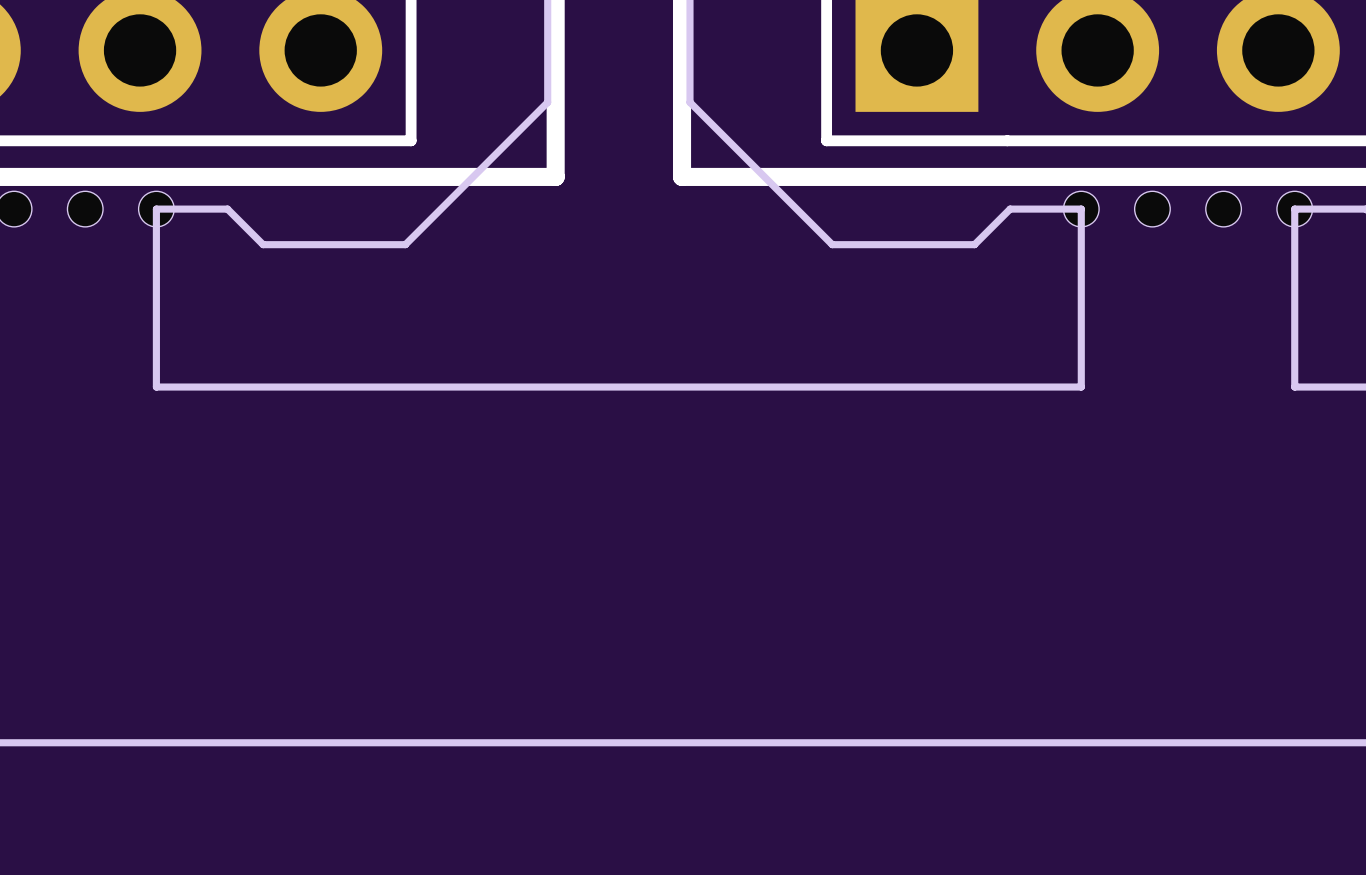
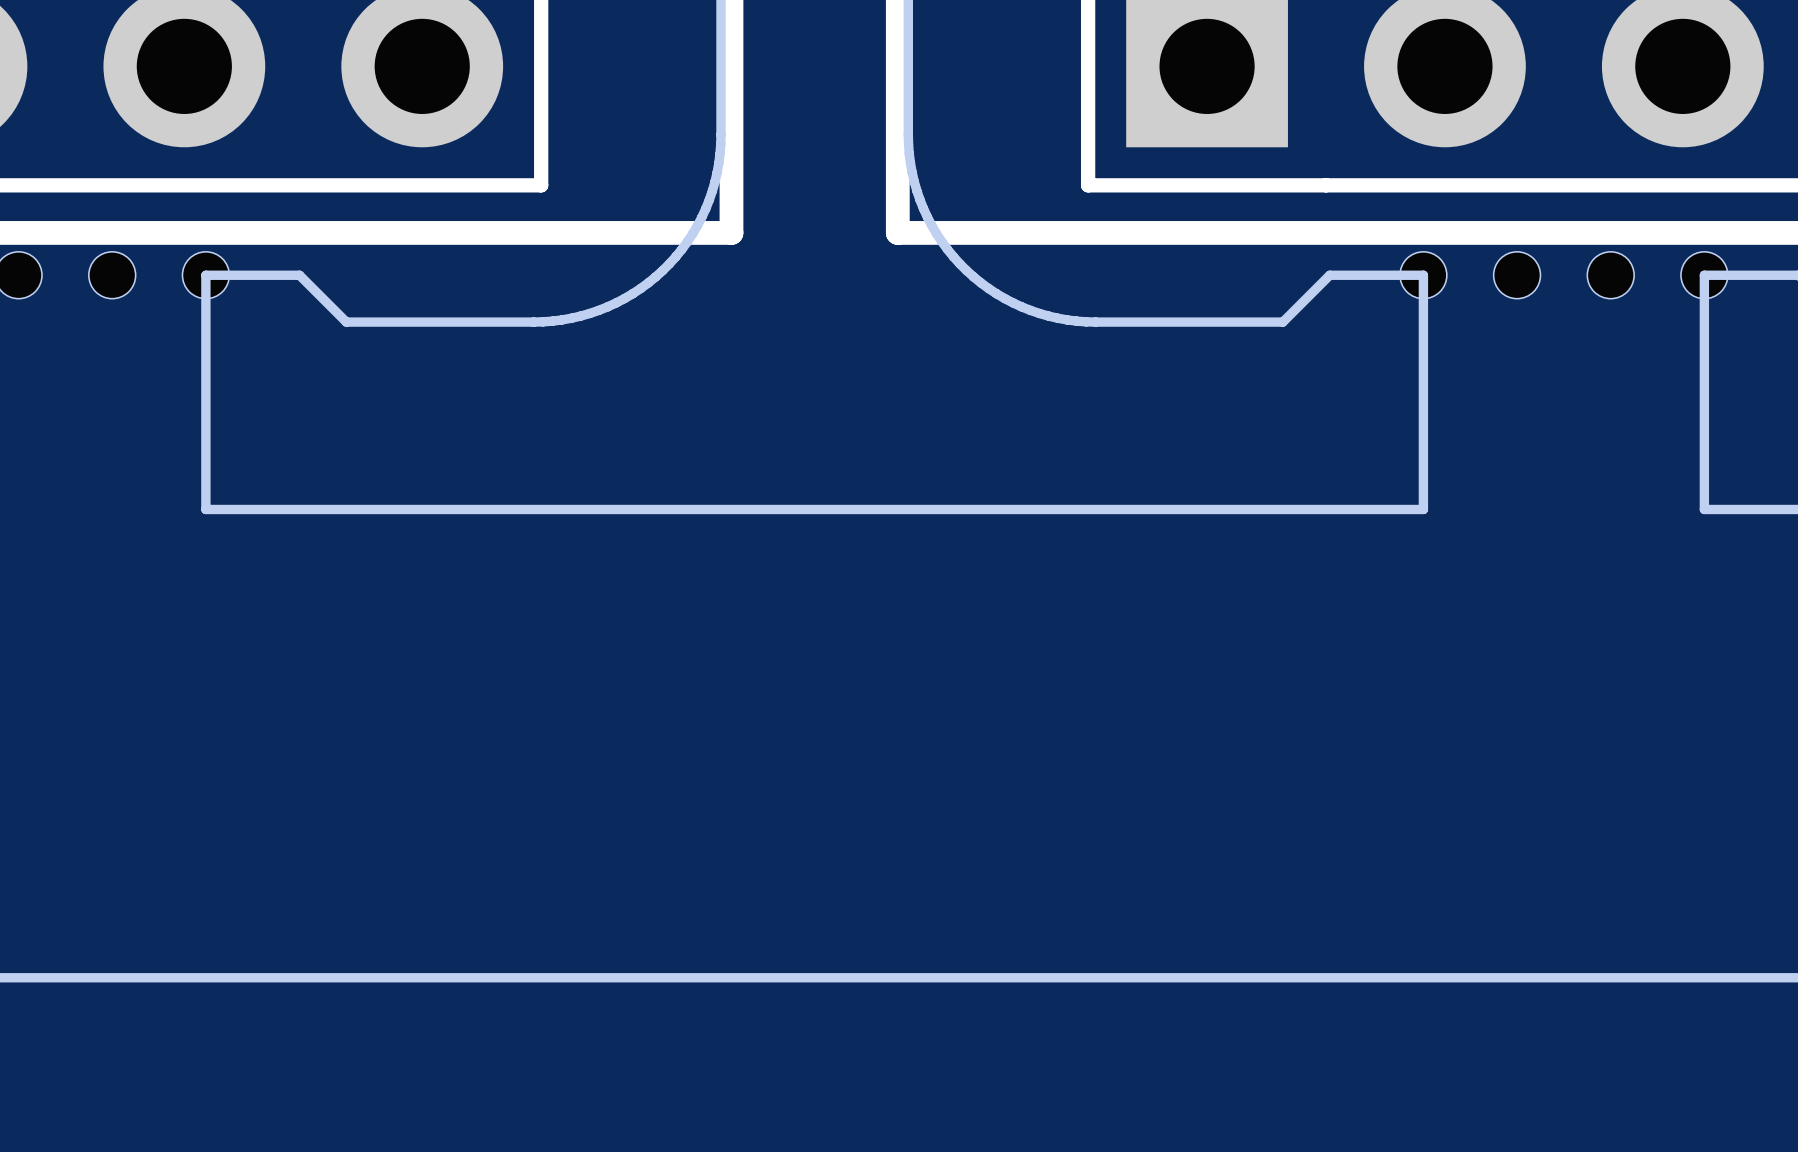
board edge: (547, 102) (405, 244) -> (720, 134) (718, 163) (709, 199) (692, 233) (669, 263) (640, 288) (607, 306) (571, 318) (533, 322)
board edge: (689, 102) (832, 244) -> (908, 134) (910, 163) (919, 199) (936, 233) (959, 263) (988, 288) (1021, 306) (1057, 318) (1095, 322)

